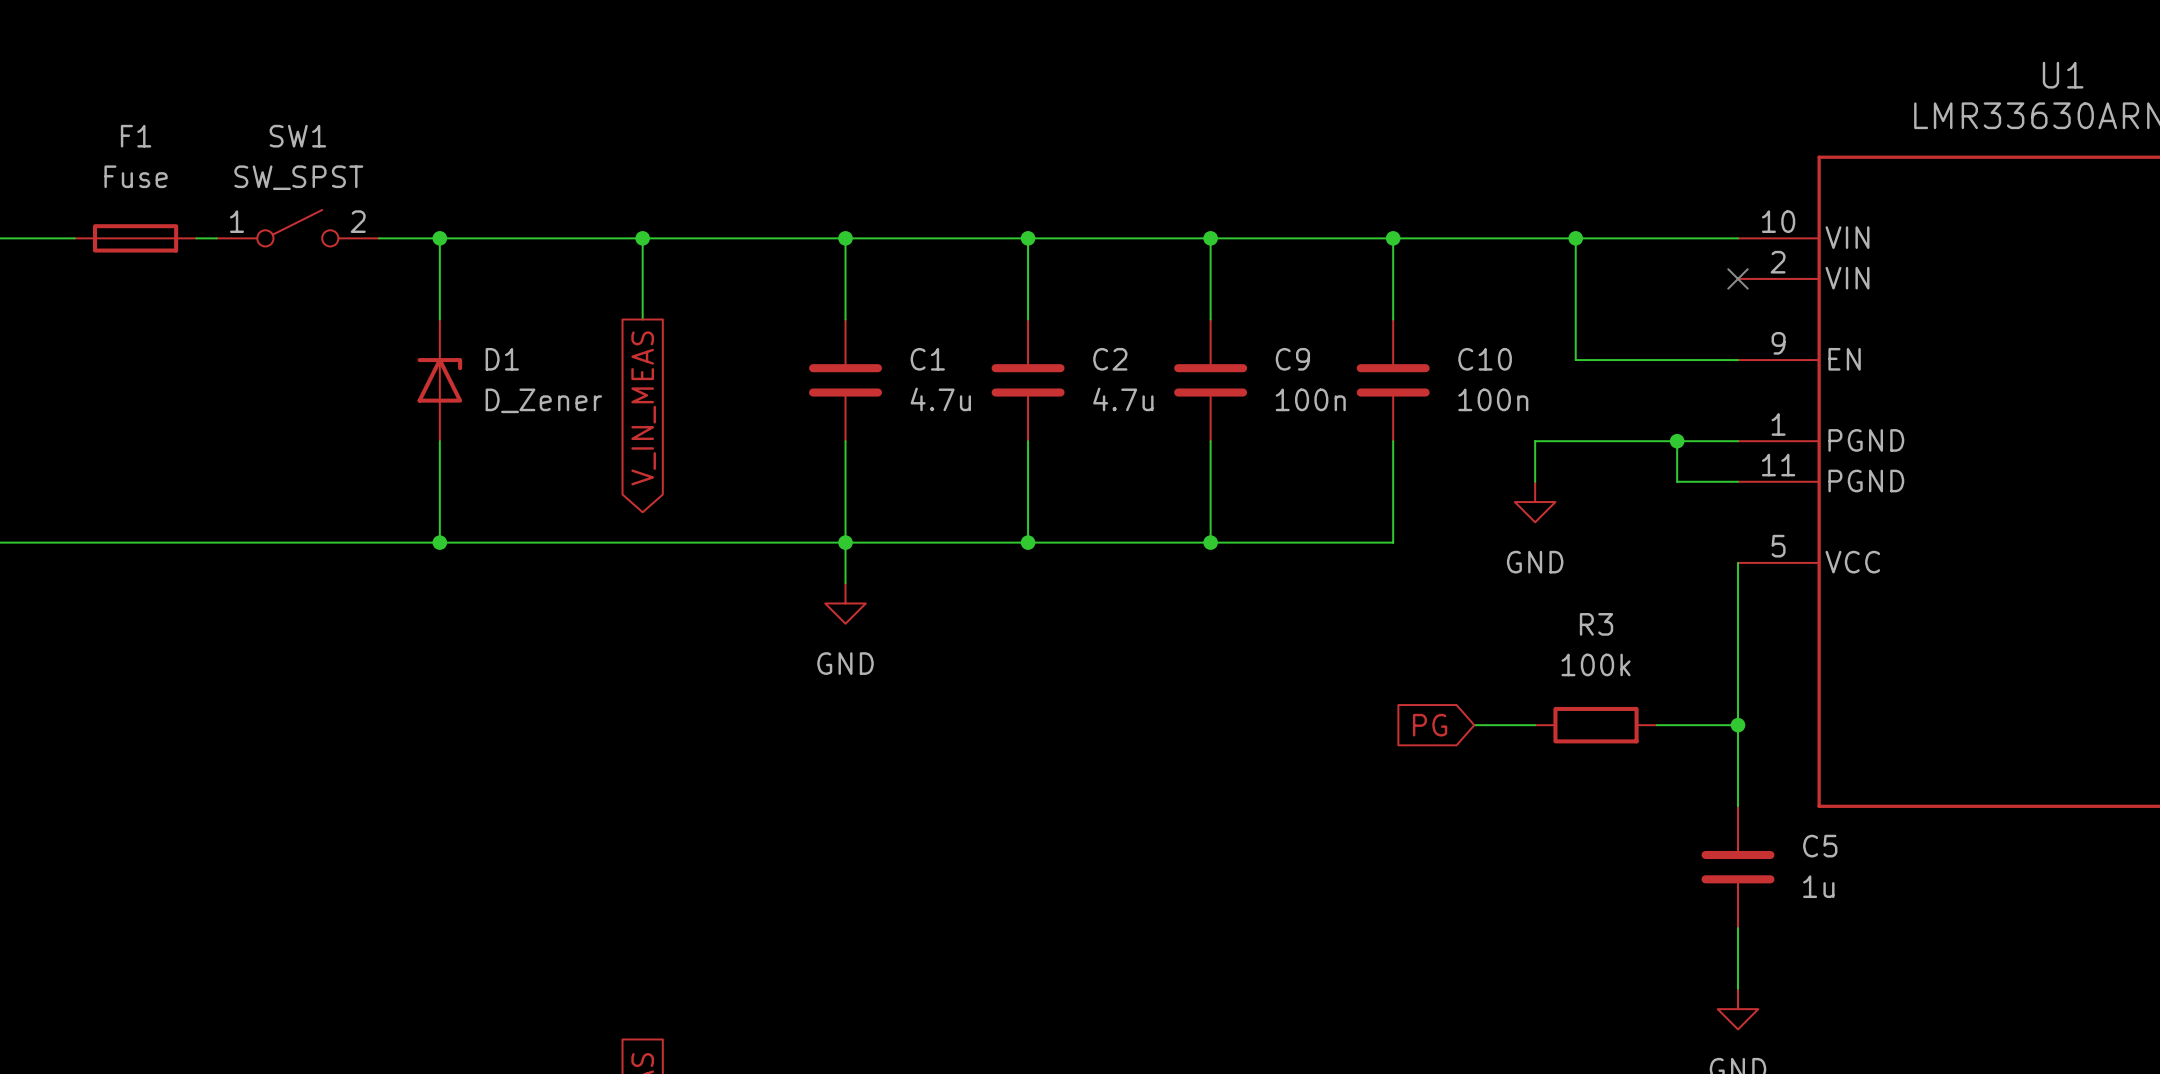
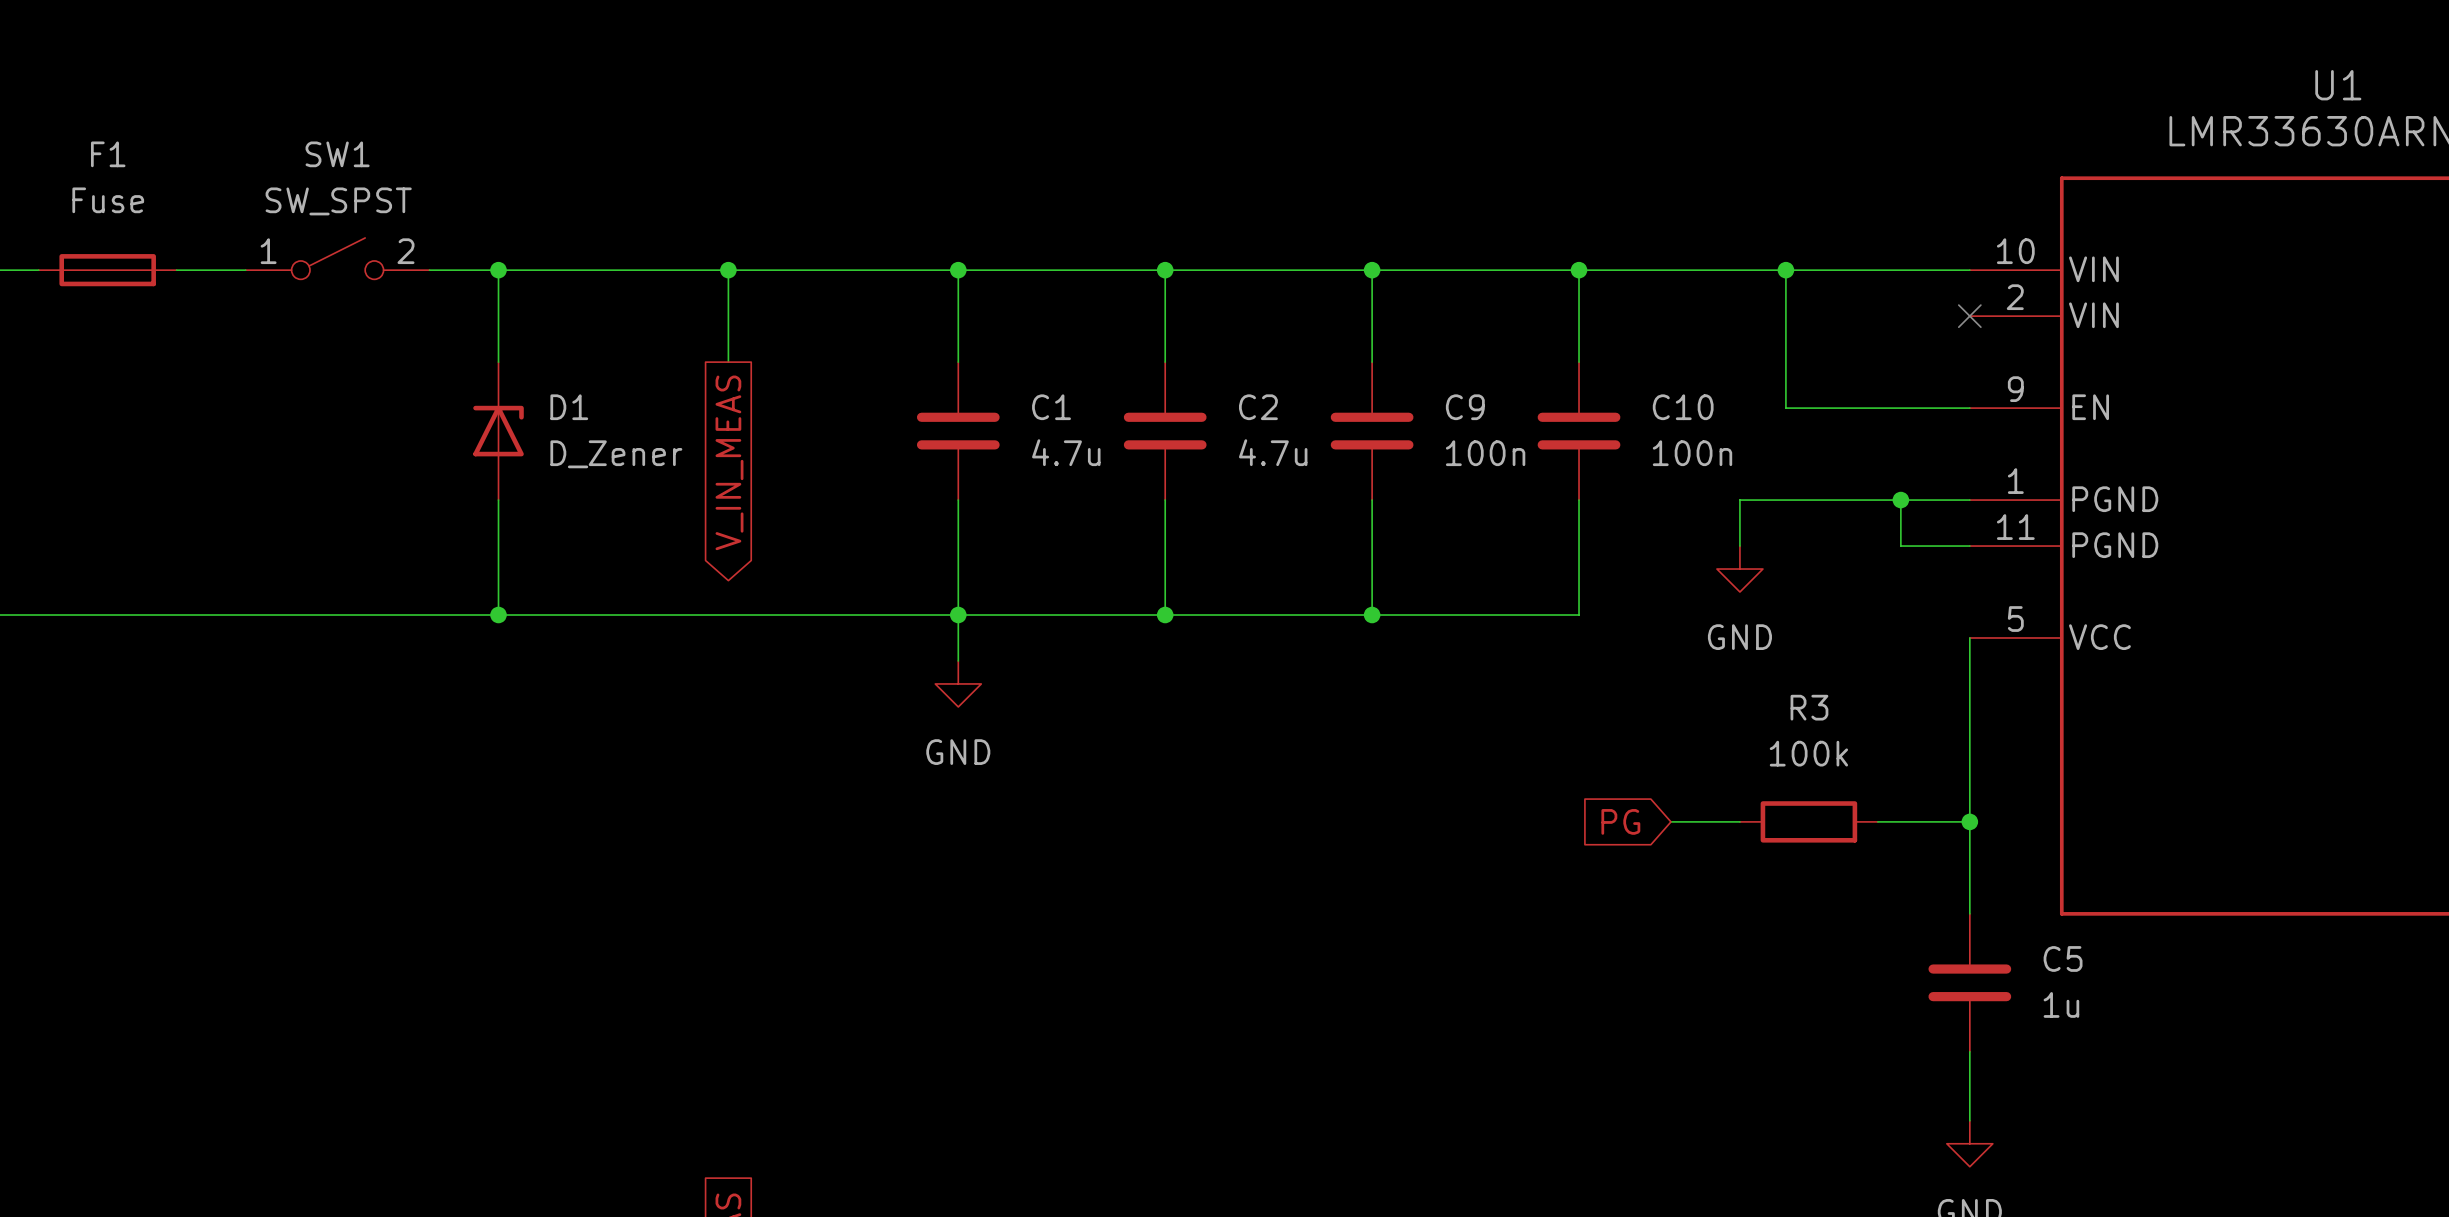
F1 position: (135, 238) -> (107, 270)

